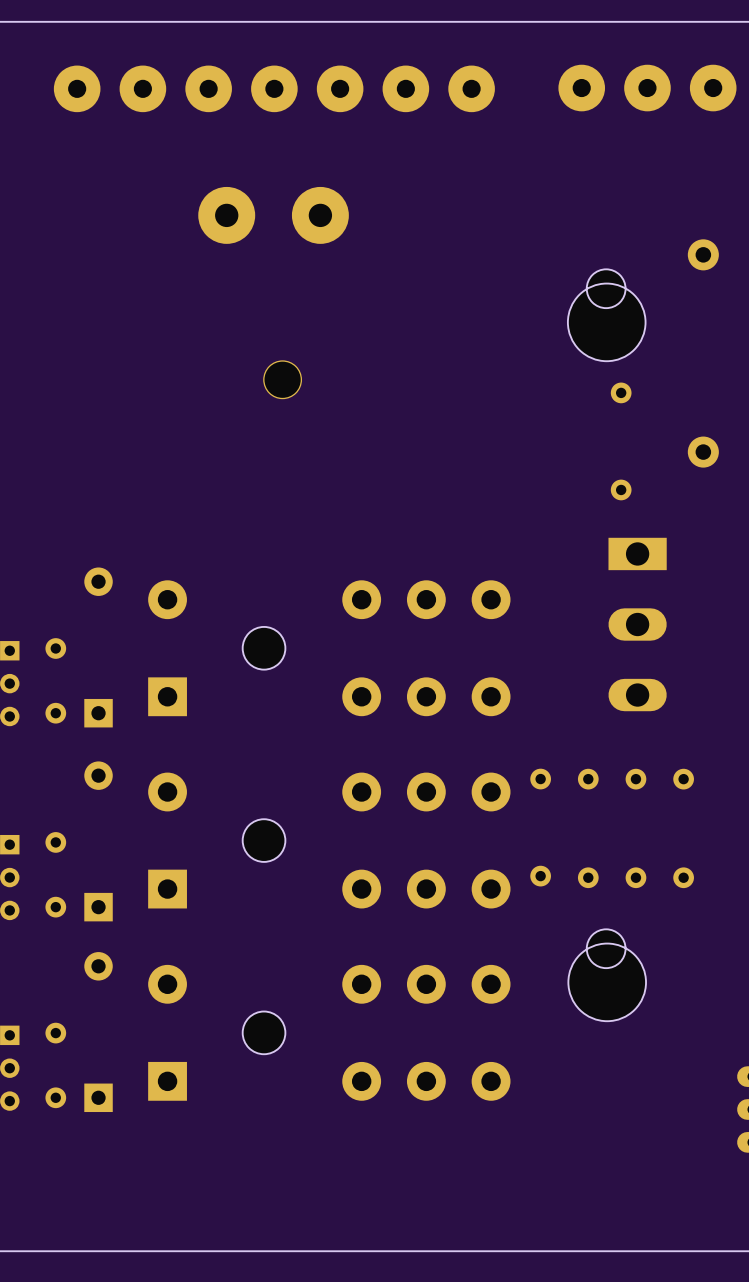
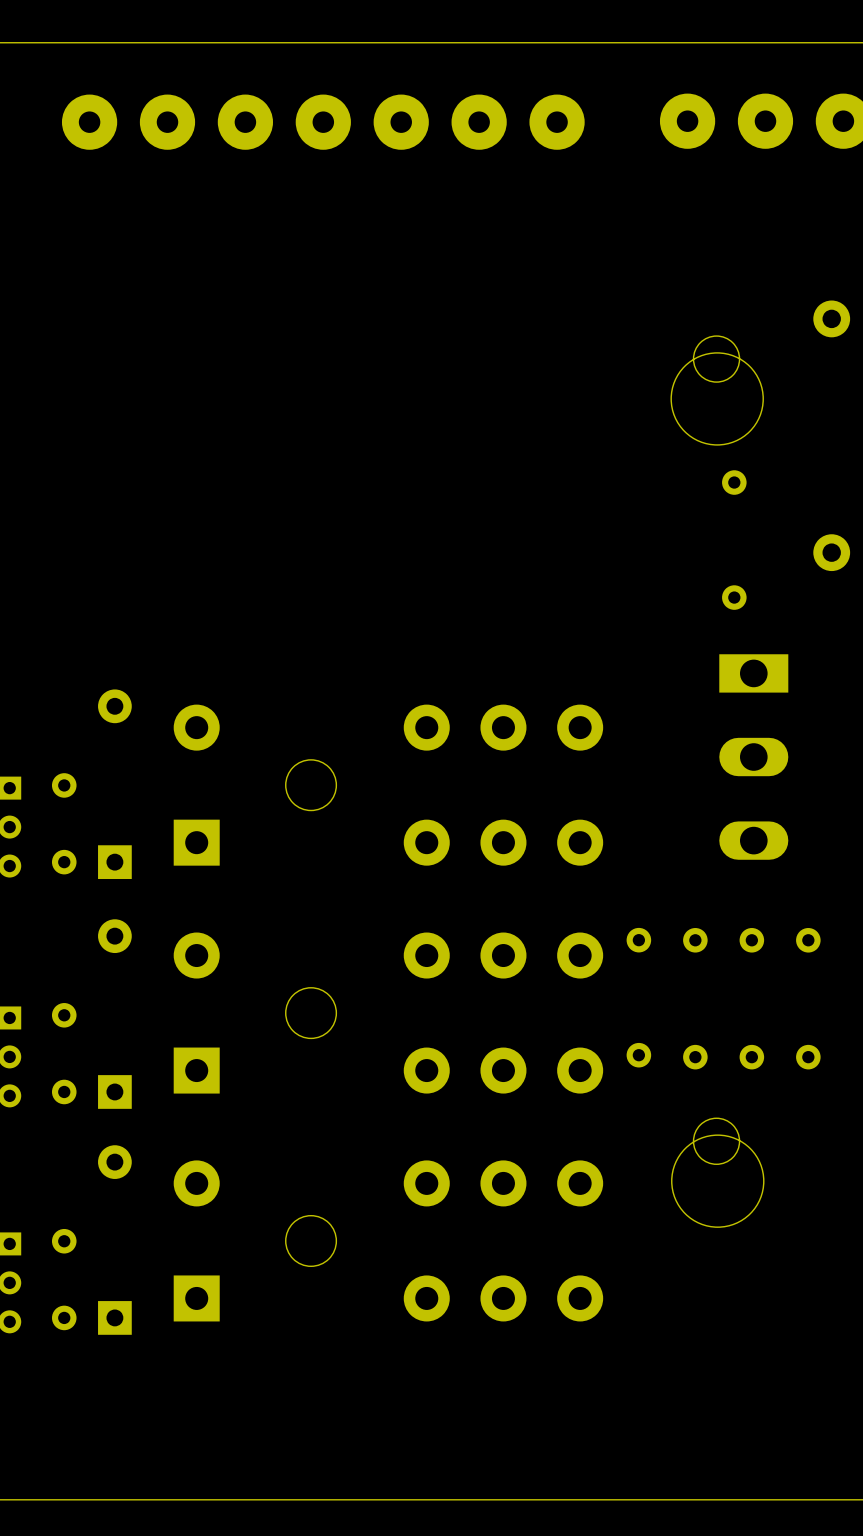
part: (226, 215) -> none
part: (320, 215) -> none
part: (282, 379) -> none

